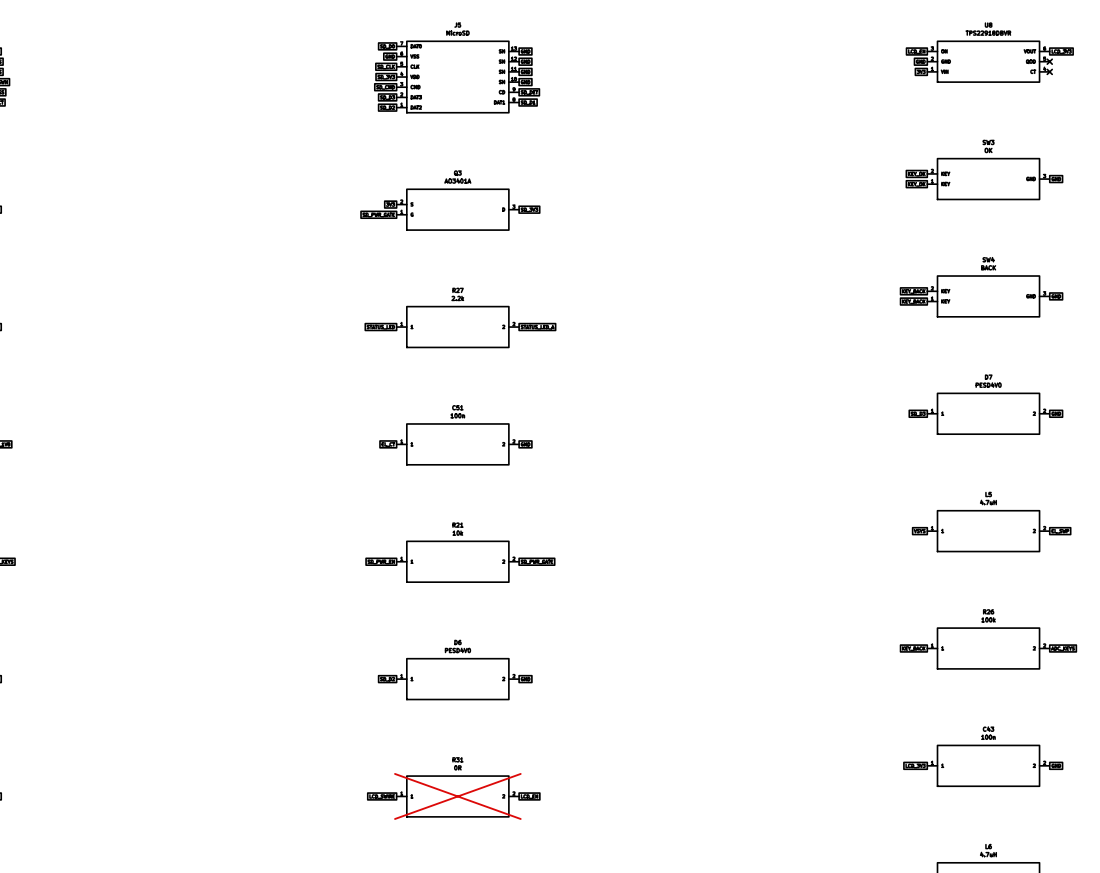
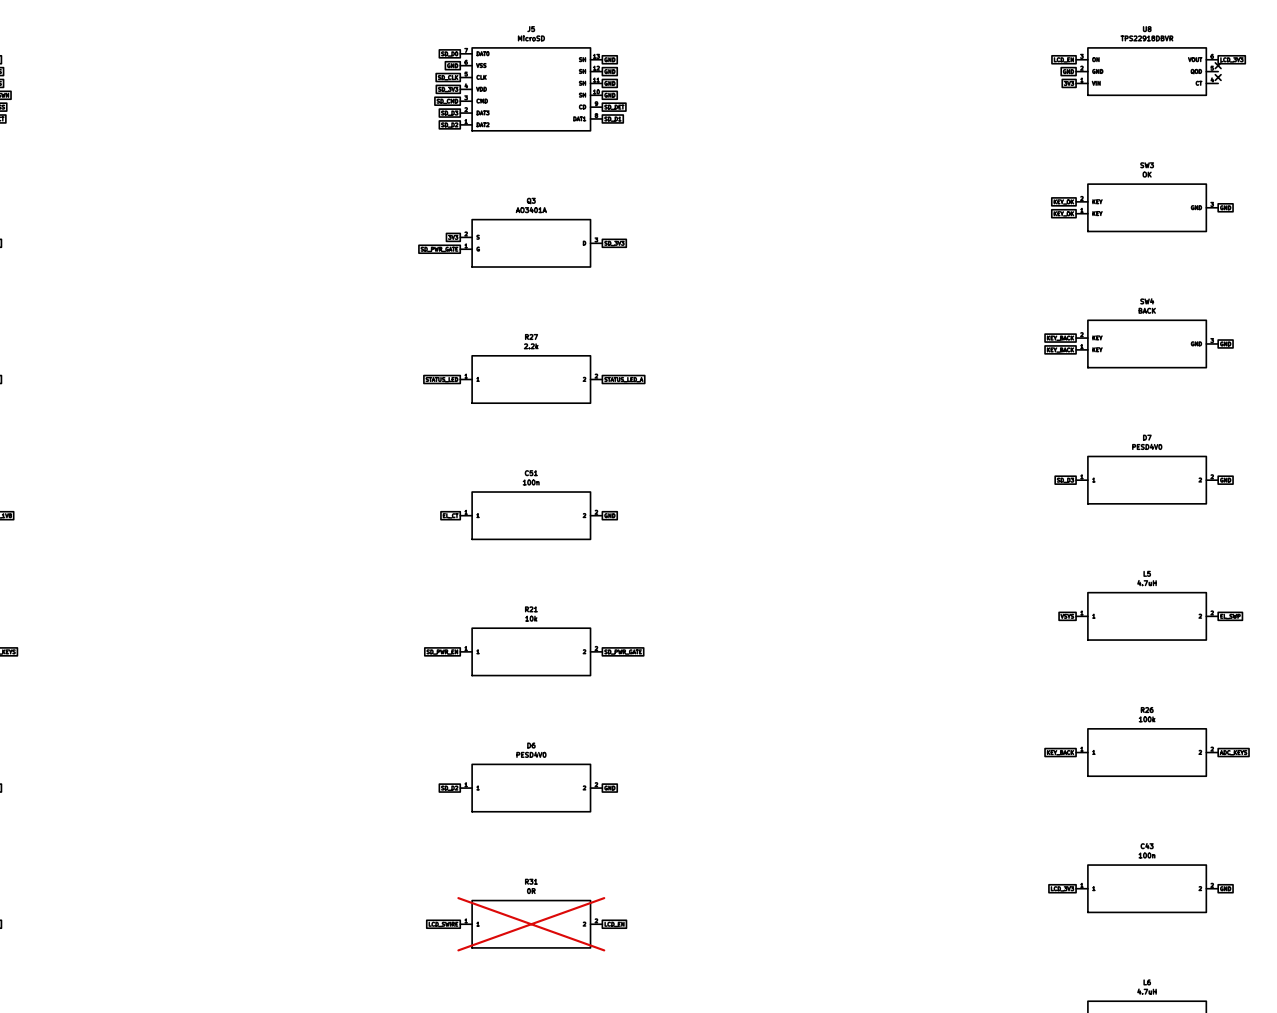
no-connect mark: none -> (1218, 65)
no-connect mark: (1049, 61) -> none
no-connect mark: none -> (1218, 77)
no-connect mark: (1049, 71) -> none

